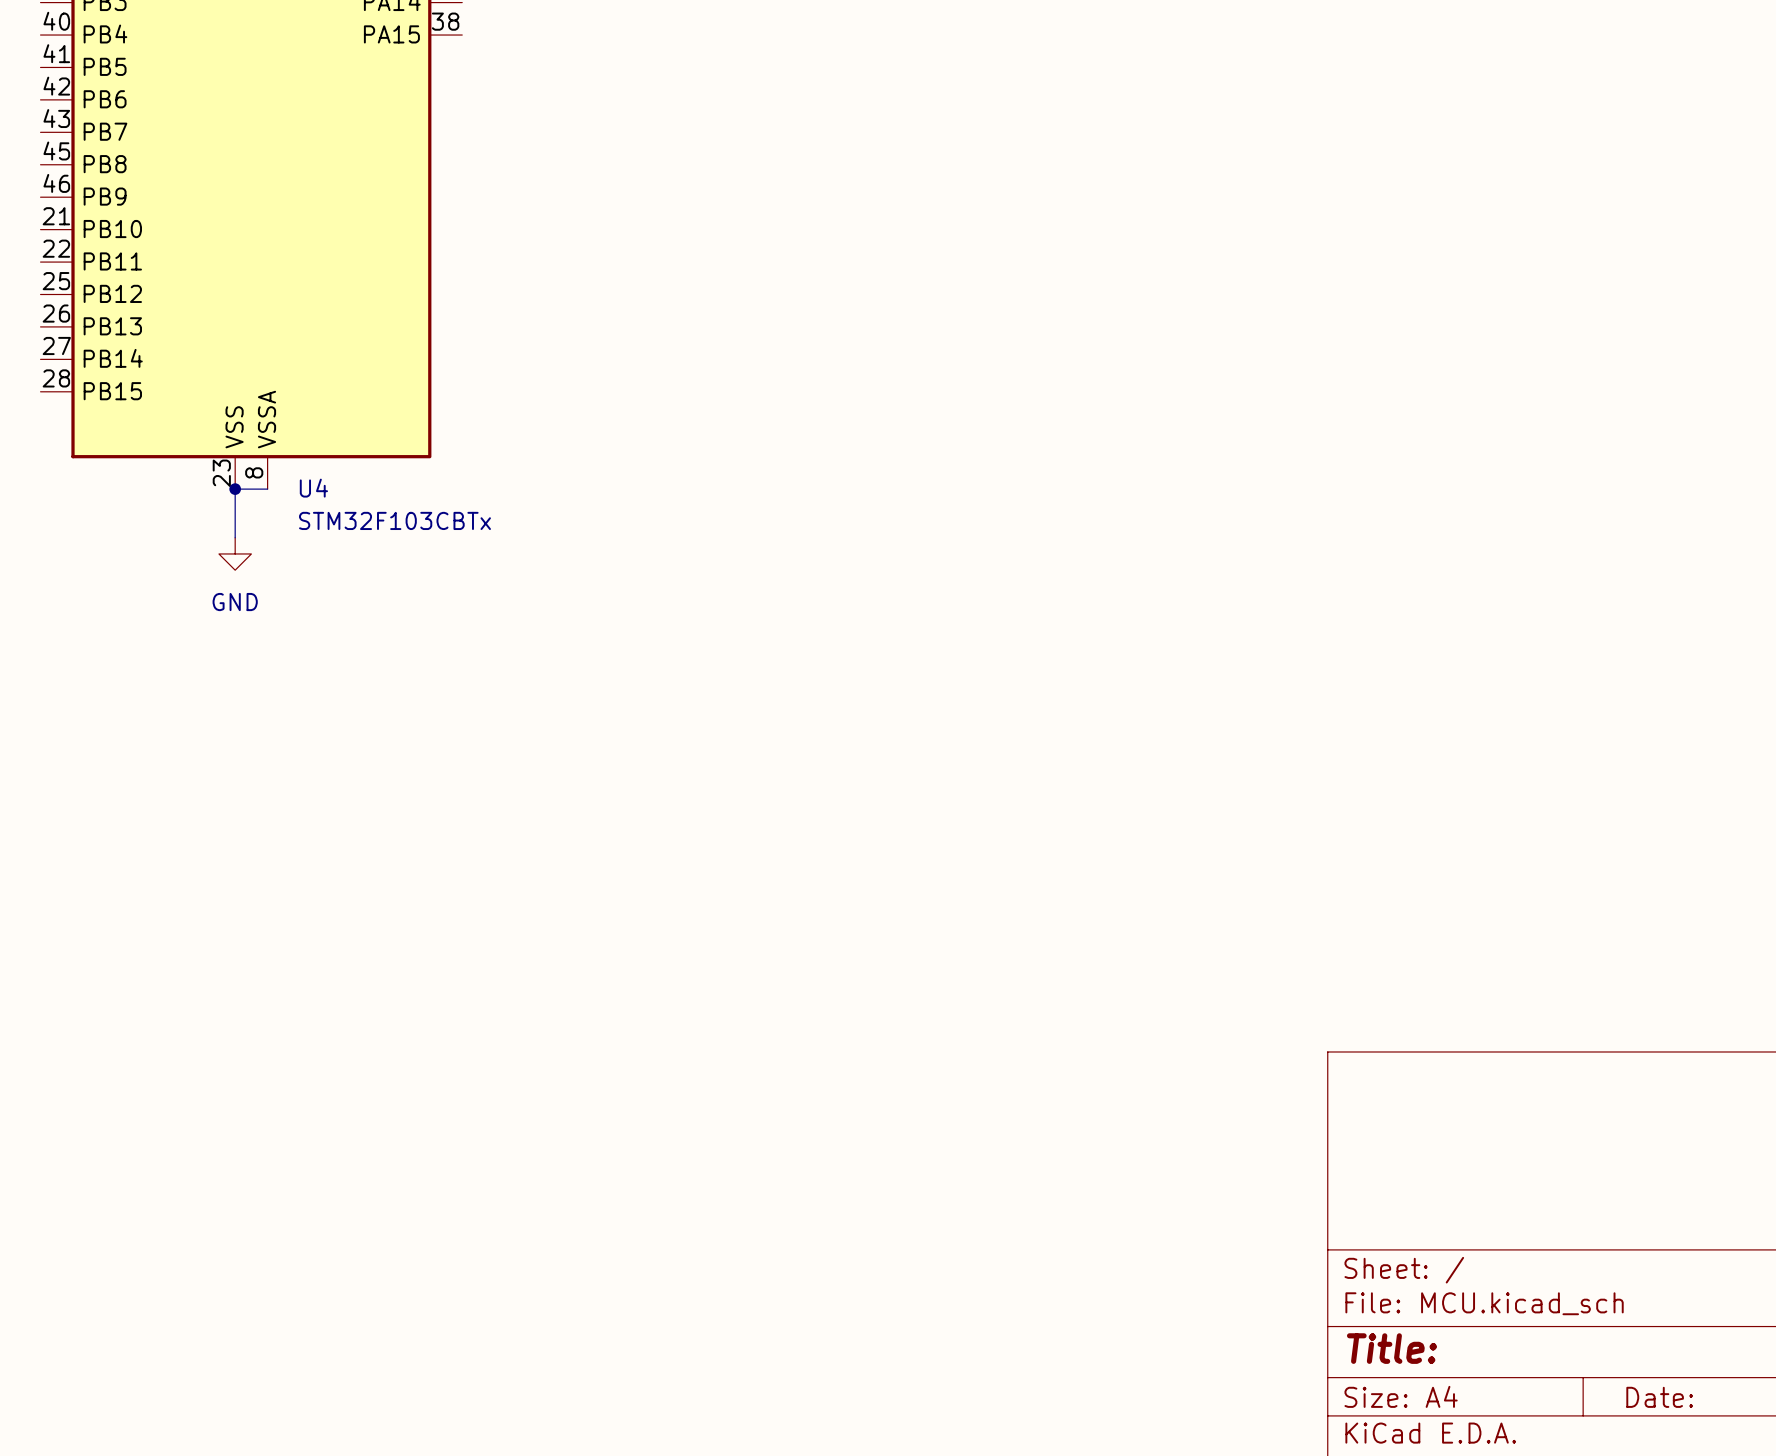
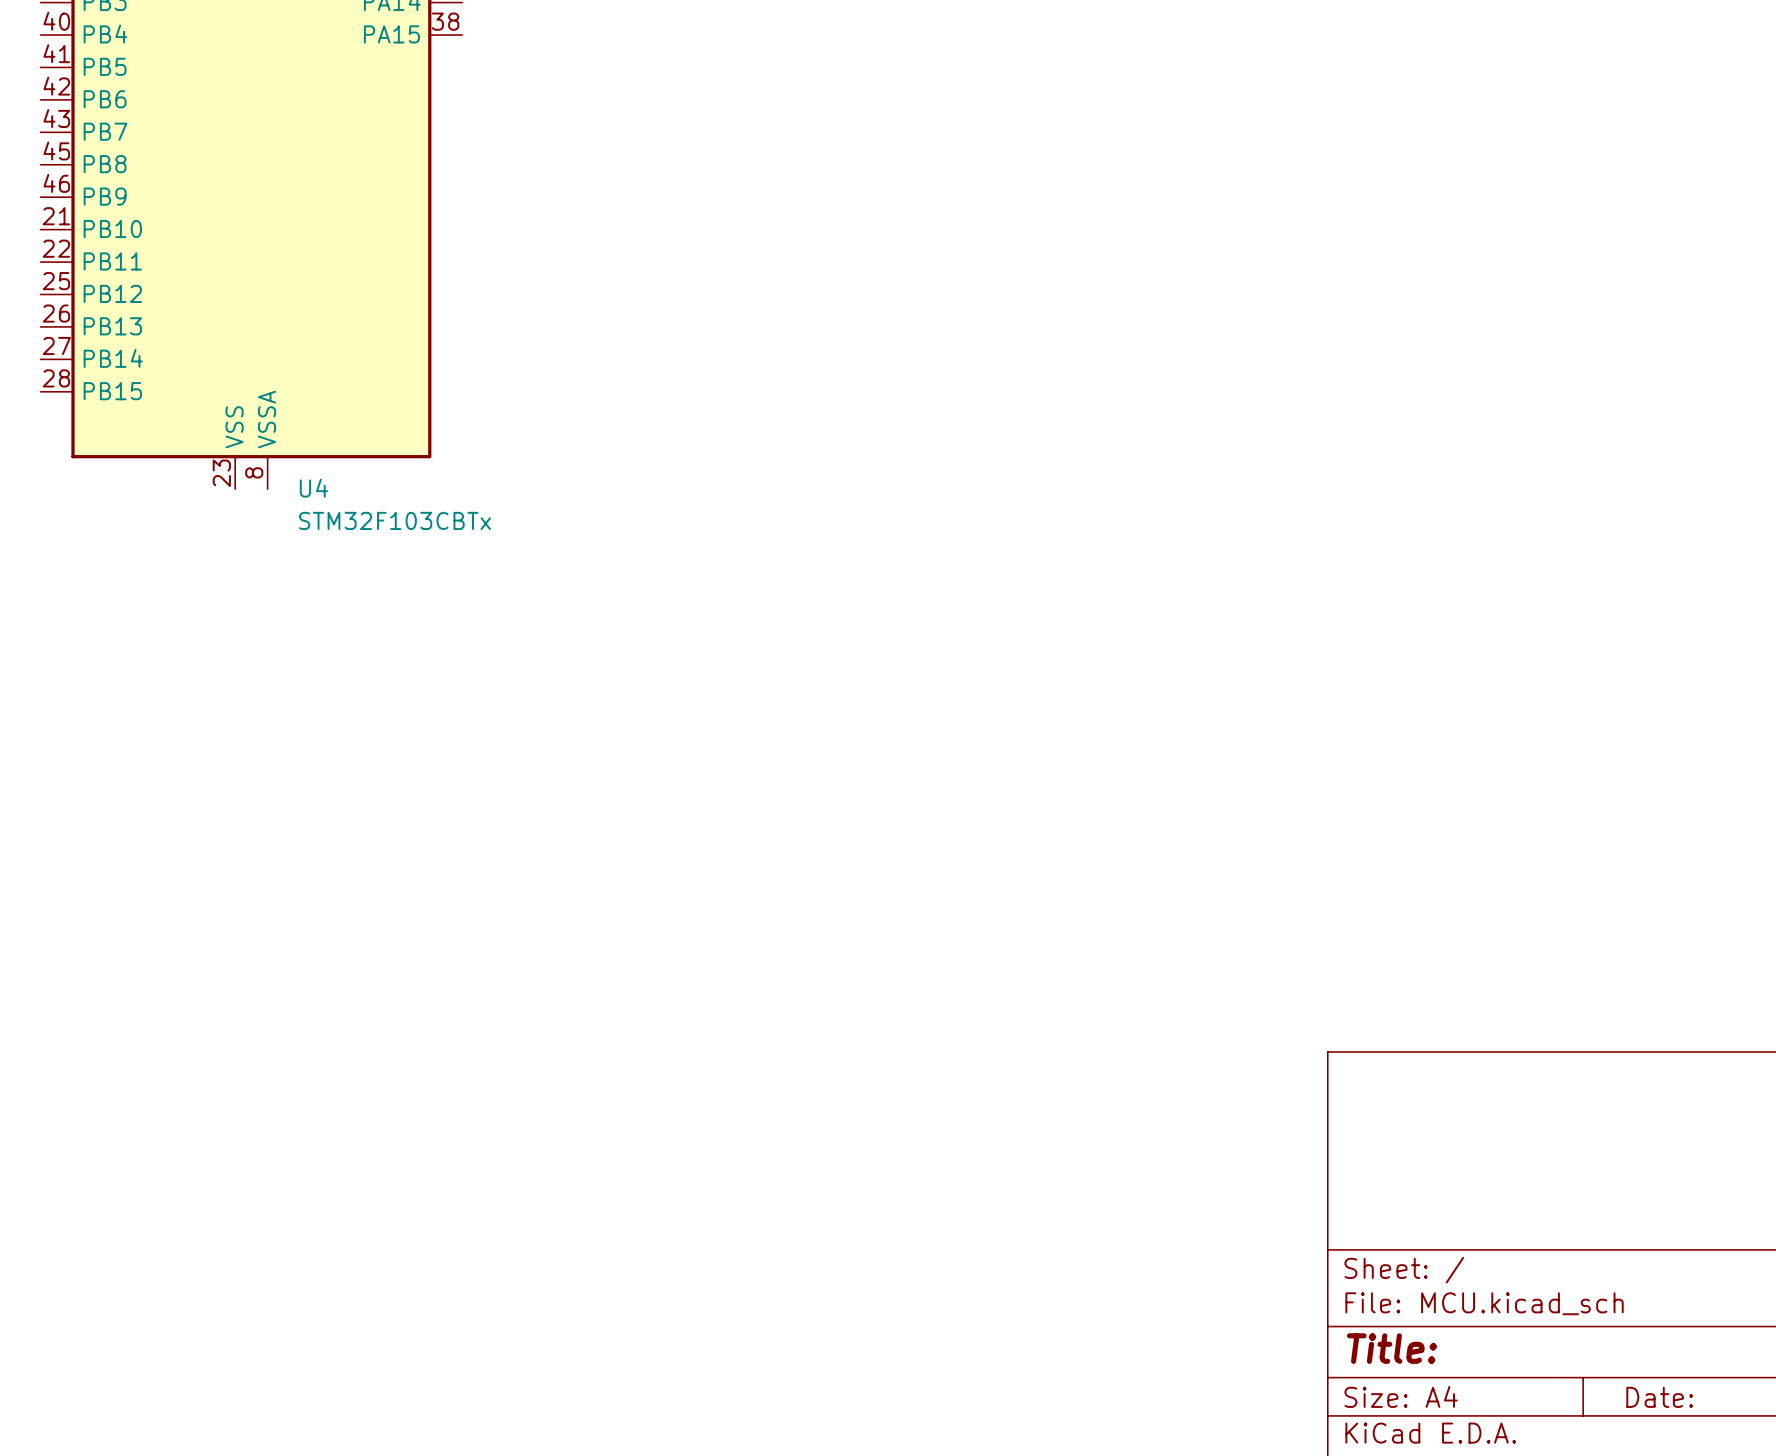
junction: (235, 489) -> none
wire: (267, 489) (235, 489) (235, 537) -> none
power symbol: GND (235, 553) -> none

